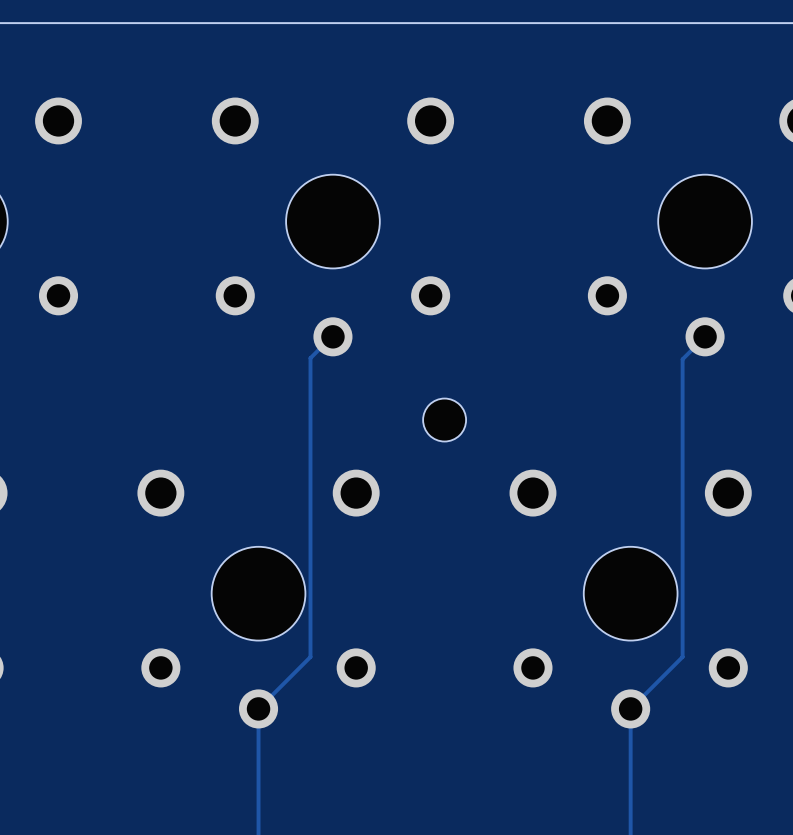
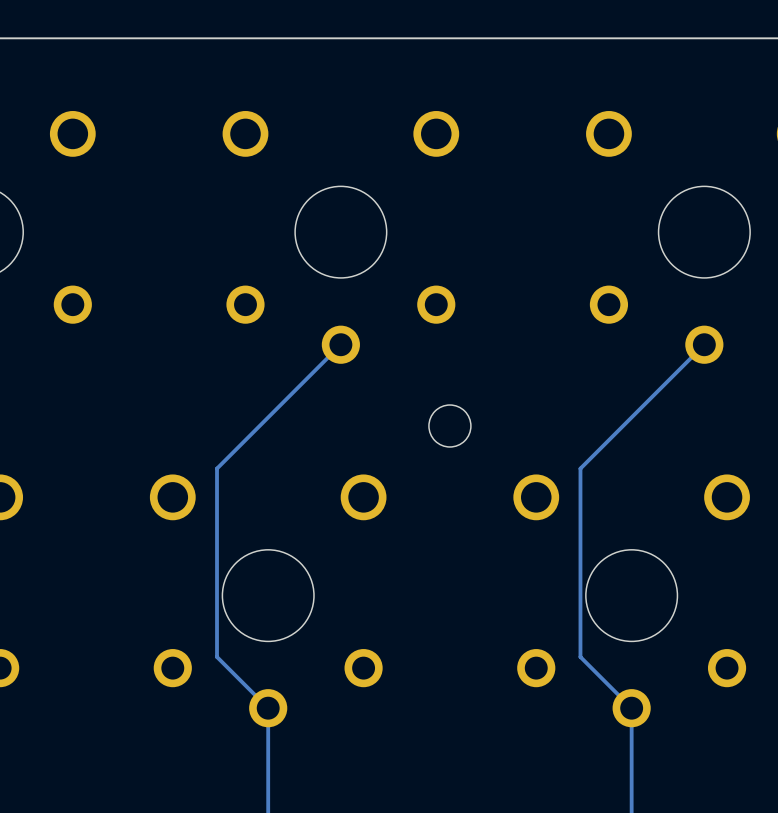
track: (332, 336) (310, 358) (310, 656) (258, 708) -> (340, 344) (217, 468) (217, 657) (268, 708)
track: (682, 359) (682, 656) (630, 708) -> (682, 366) (580, 468) (580, 657) (631, 708)

